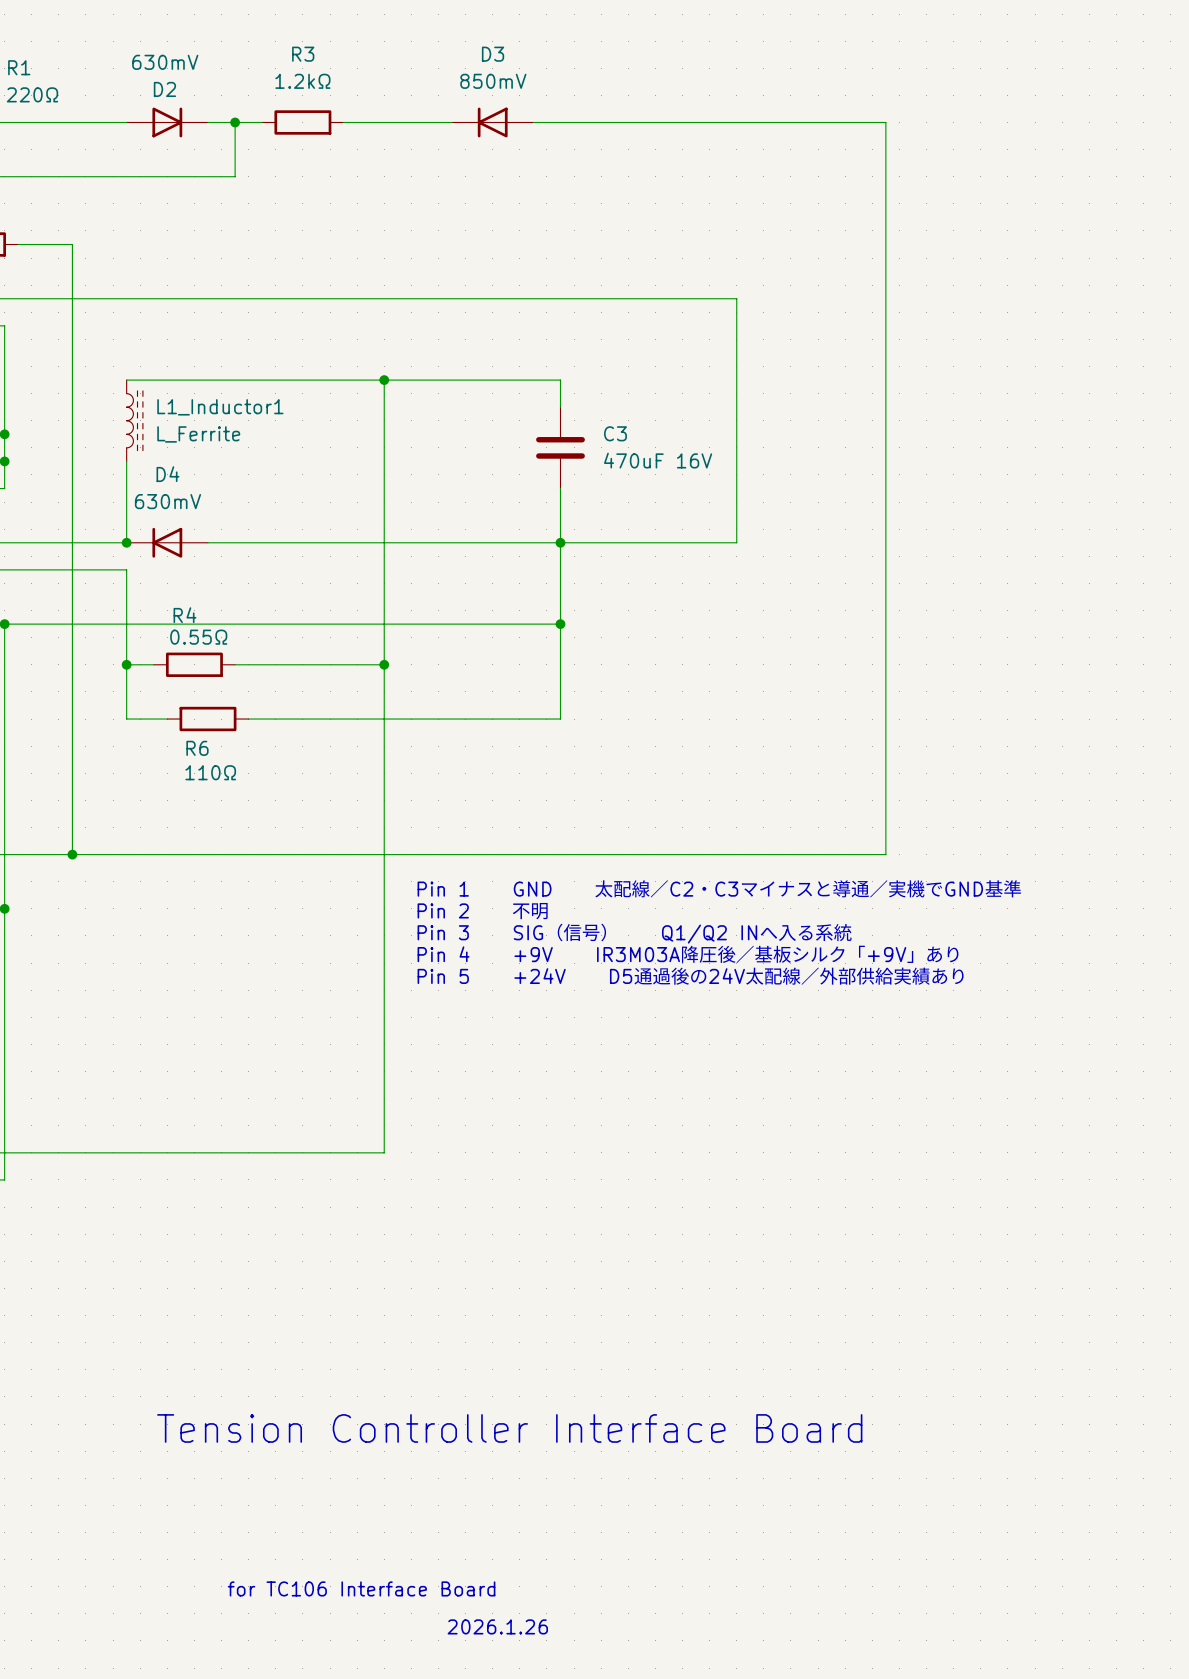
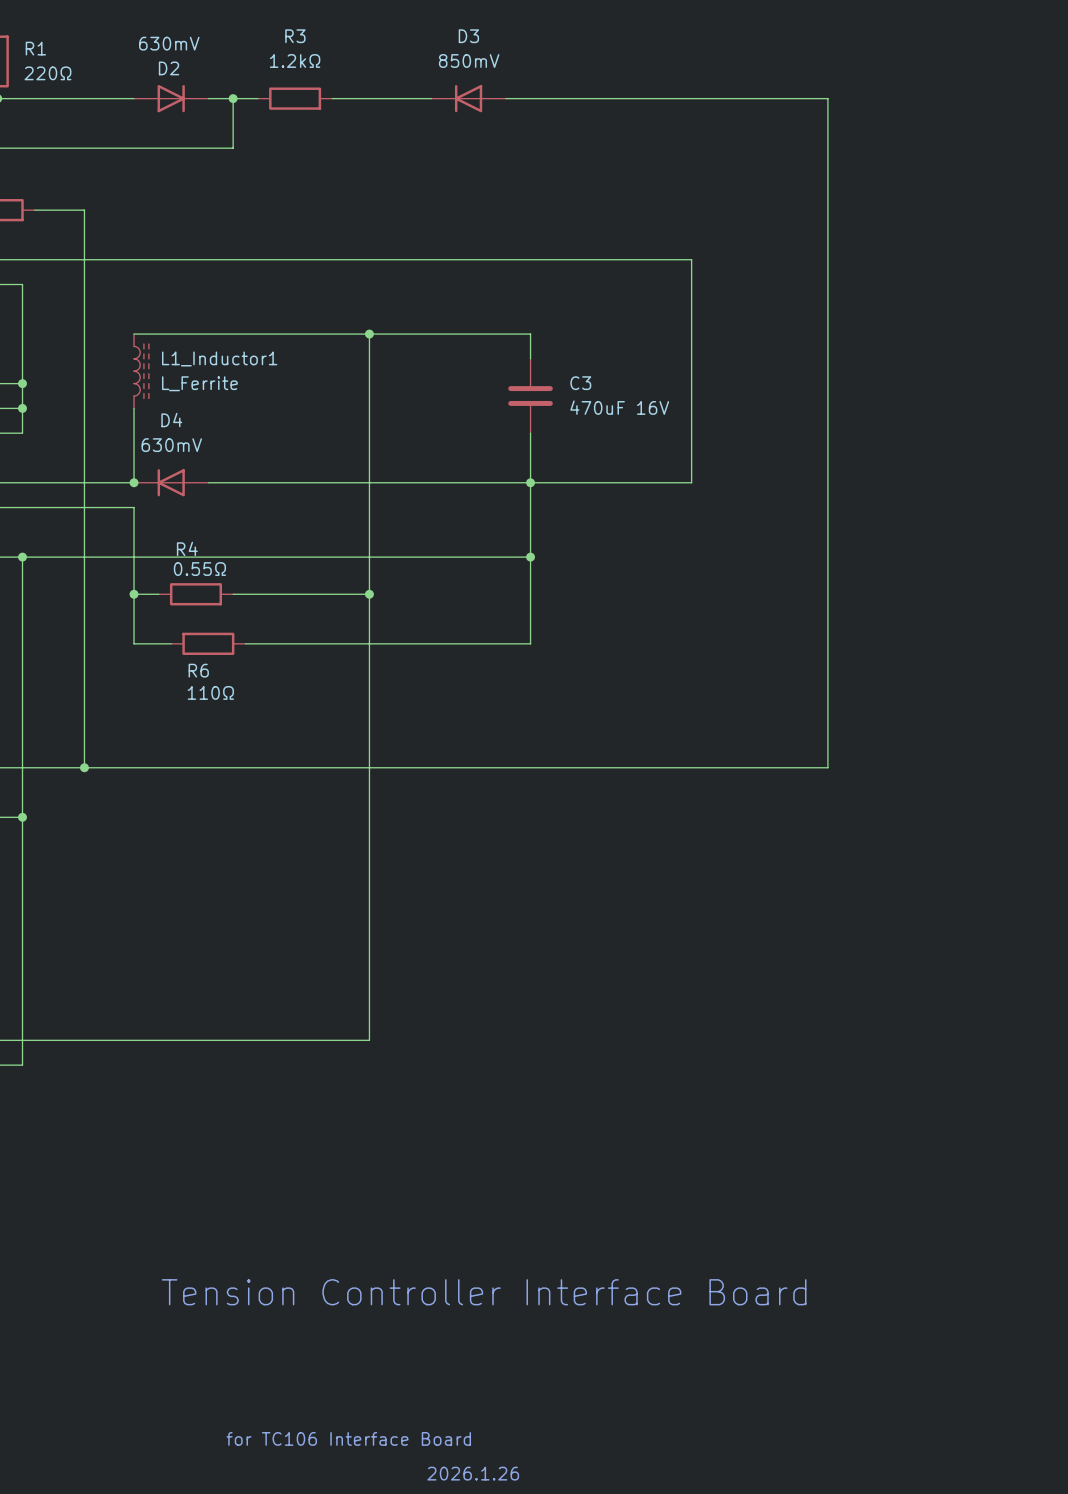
text: Pin 1 GND 太配線／C2・C3マイナスと導通／実機でGND基準 (719, 888) -> none
text: Pin 2 不明 (483, 911) -> none
text: Pin 3 SIG（信号） Q1/Q2 INへ入る系統 (634, 933) -> none
text: Pin 4 +9V IR3M03A降圧後／基板シルク「+9V」あり (688, 954) -> none
text: Pin 5 +24V D5通過後の24V太配線／外部供給実績あり (690, 976) -> none

